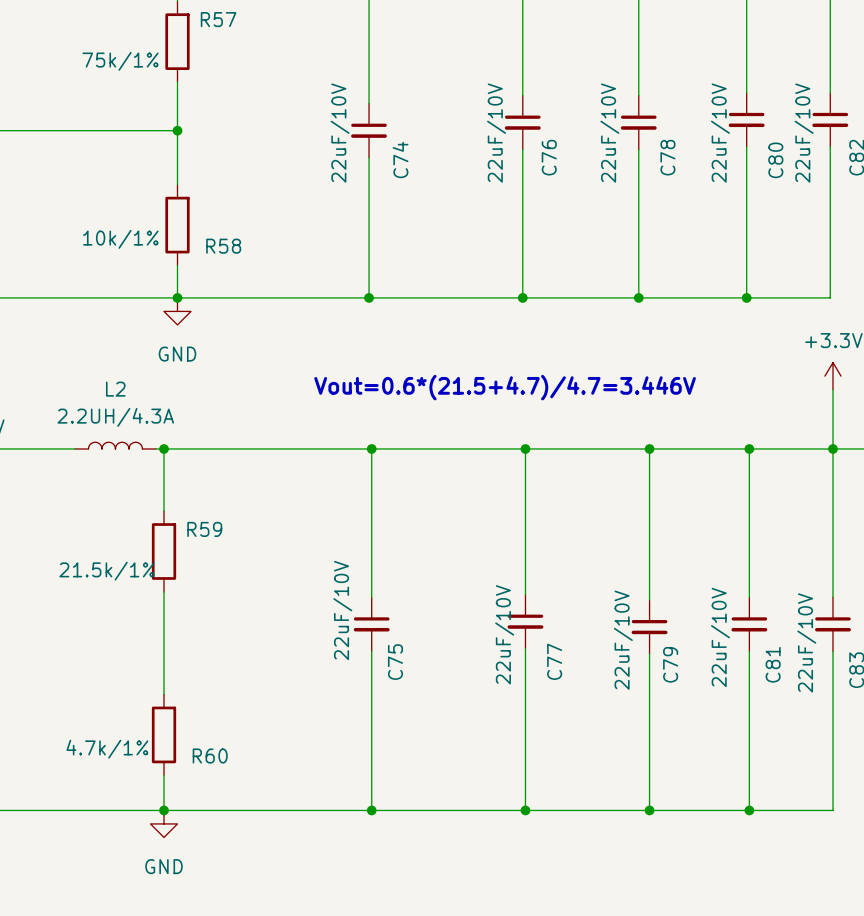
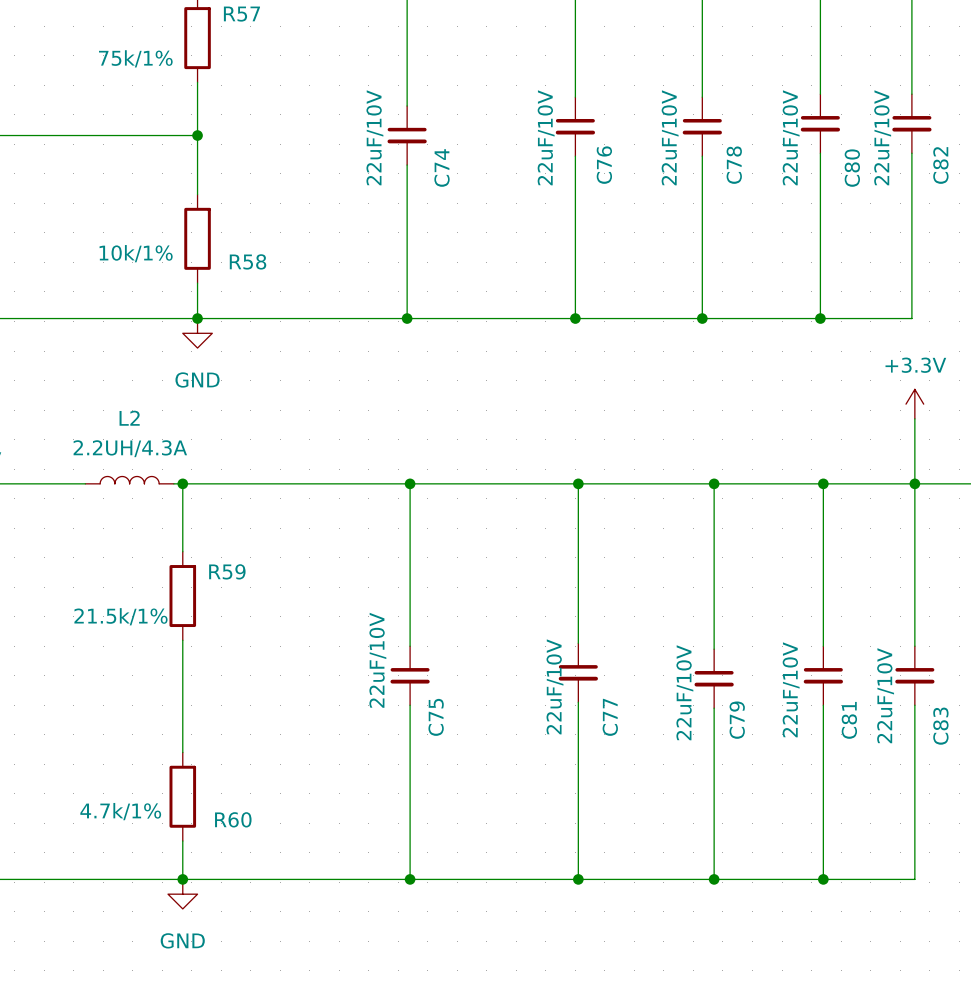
text: Vout=0.6*(21.5+4.7)/4.7=3.446V (505, 387) -> none

